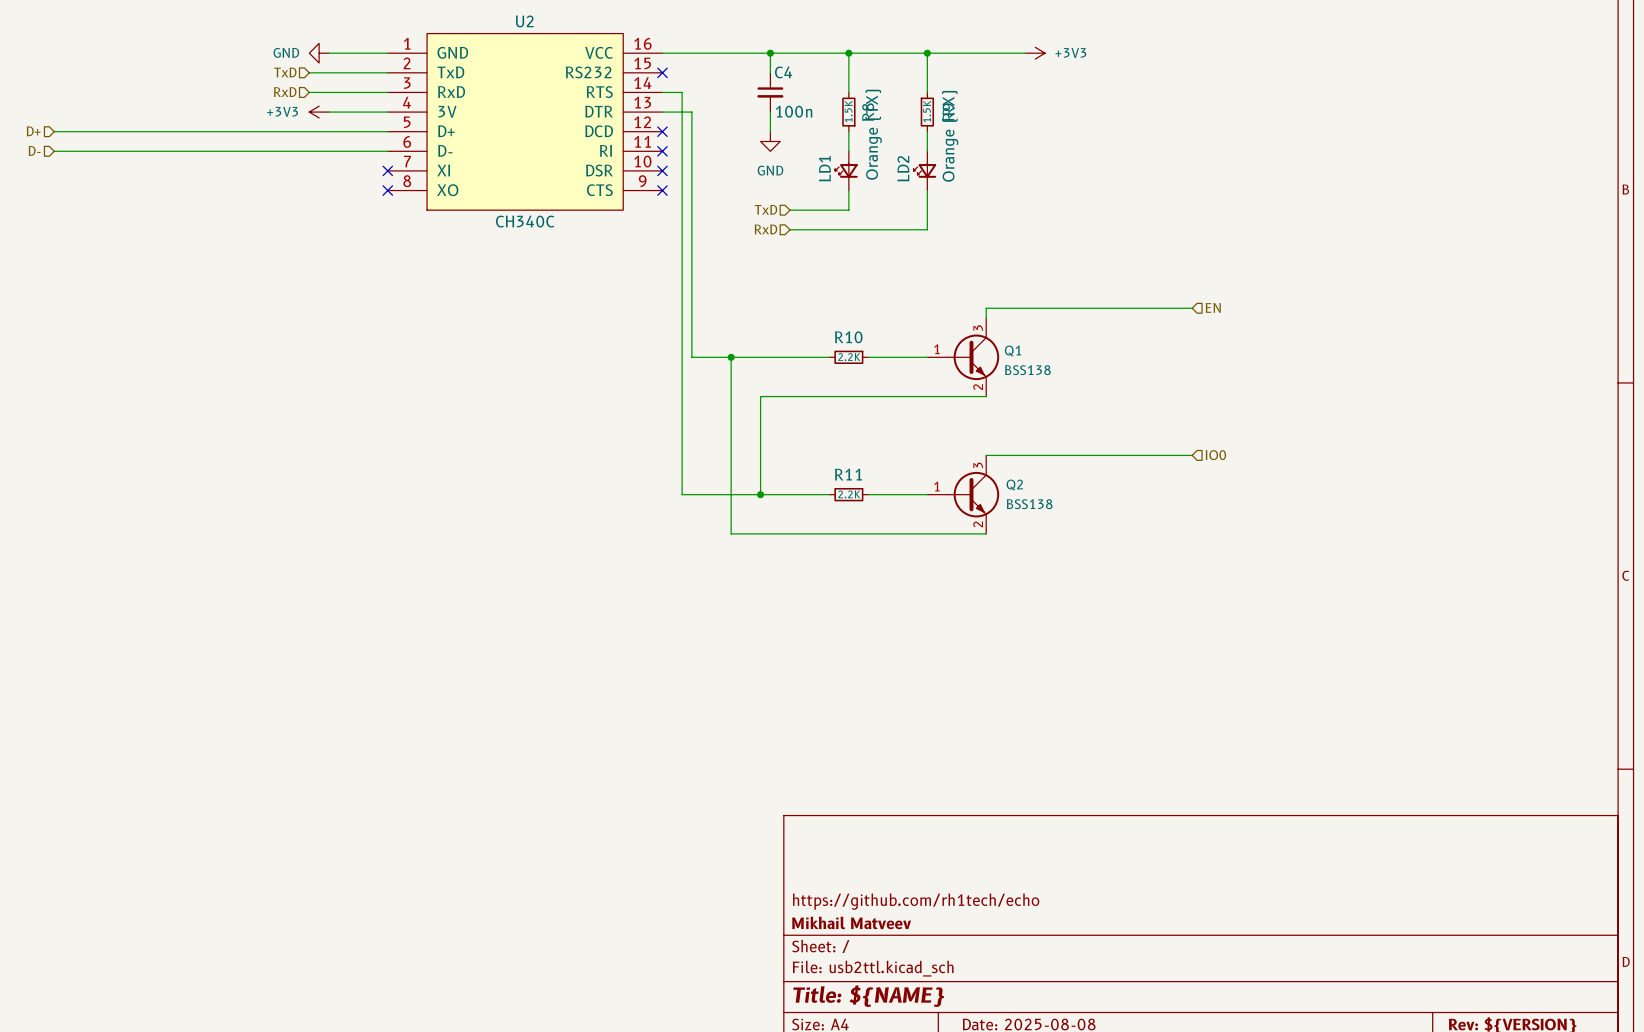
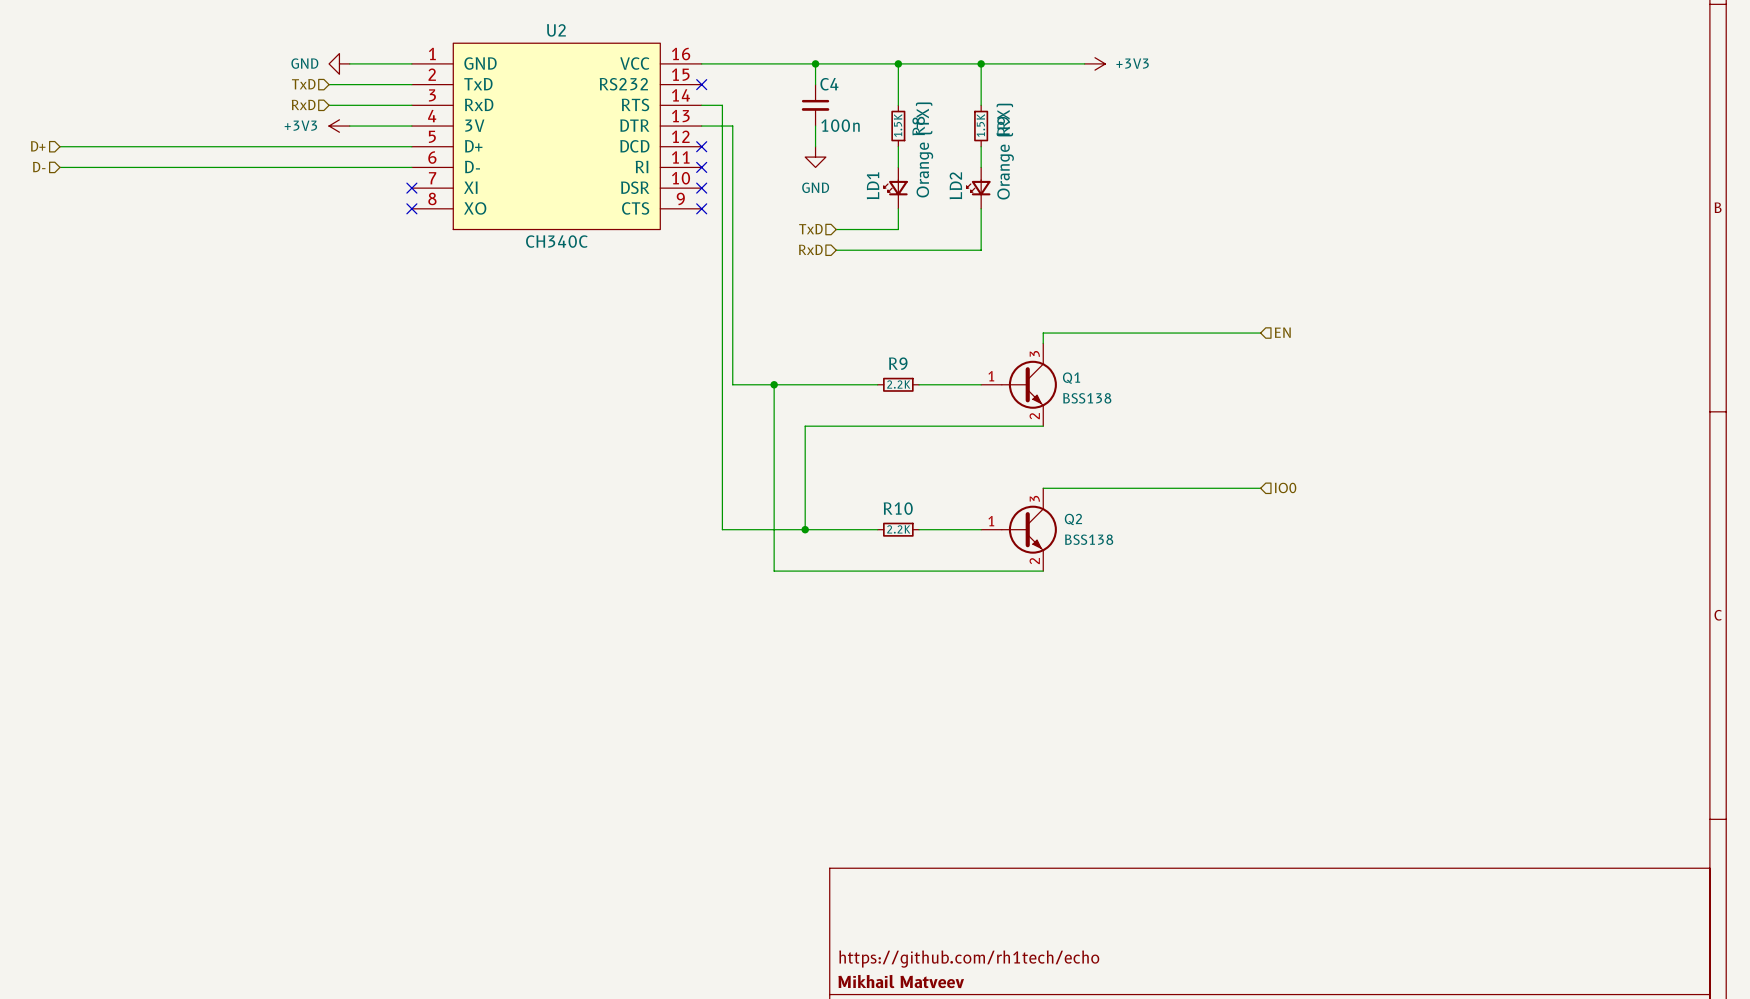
R10 name: R10 (848, 337) -> R9 (898, 363)
R11 name: R11 (848, 474) -> R10 (898, 508)

